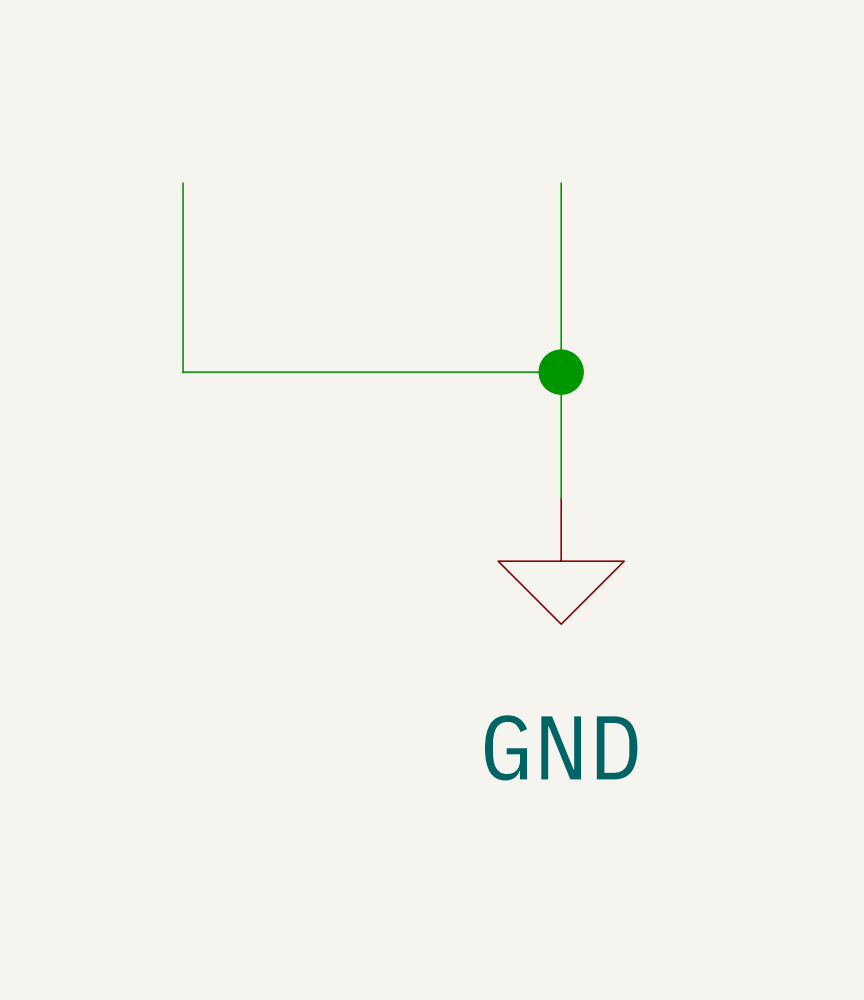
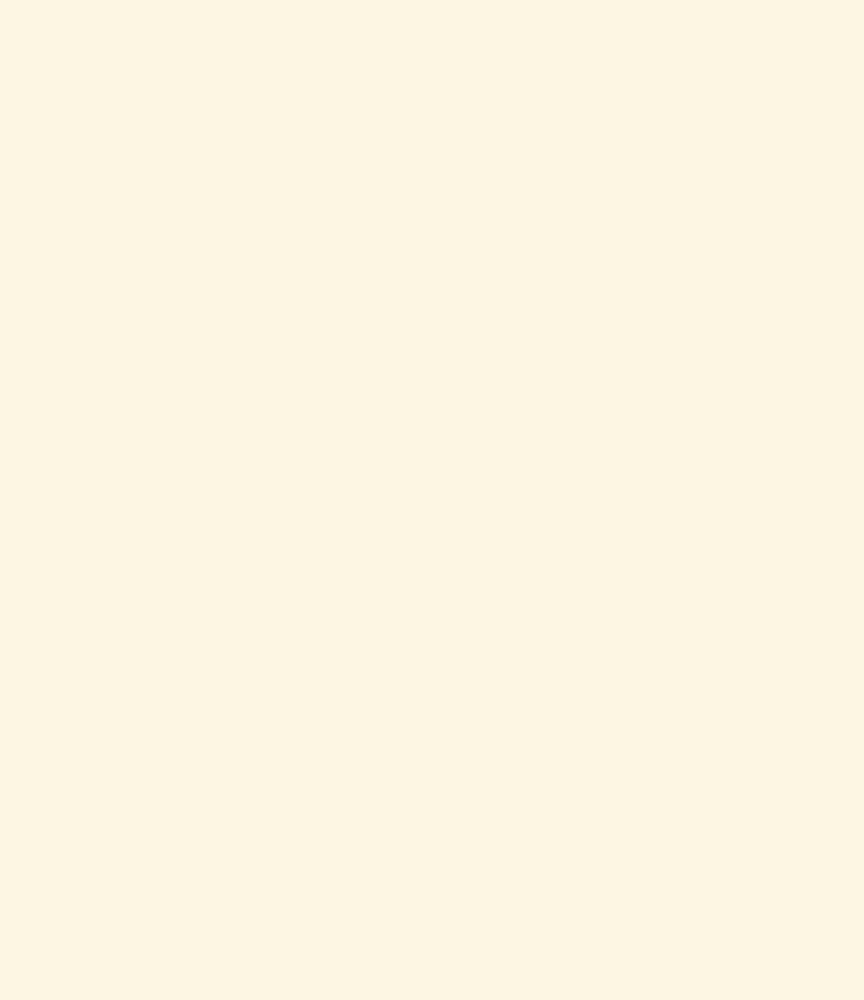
wire: (183, 183) (183, 372) (561, 372) -> none
wire: (561, 183) (561, 498) -> none
junction: (561, 372) -> none
power symbol: GND (561, 561) -> none

